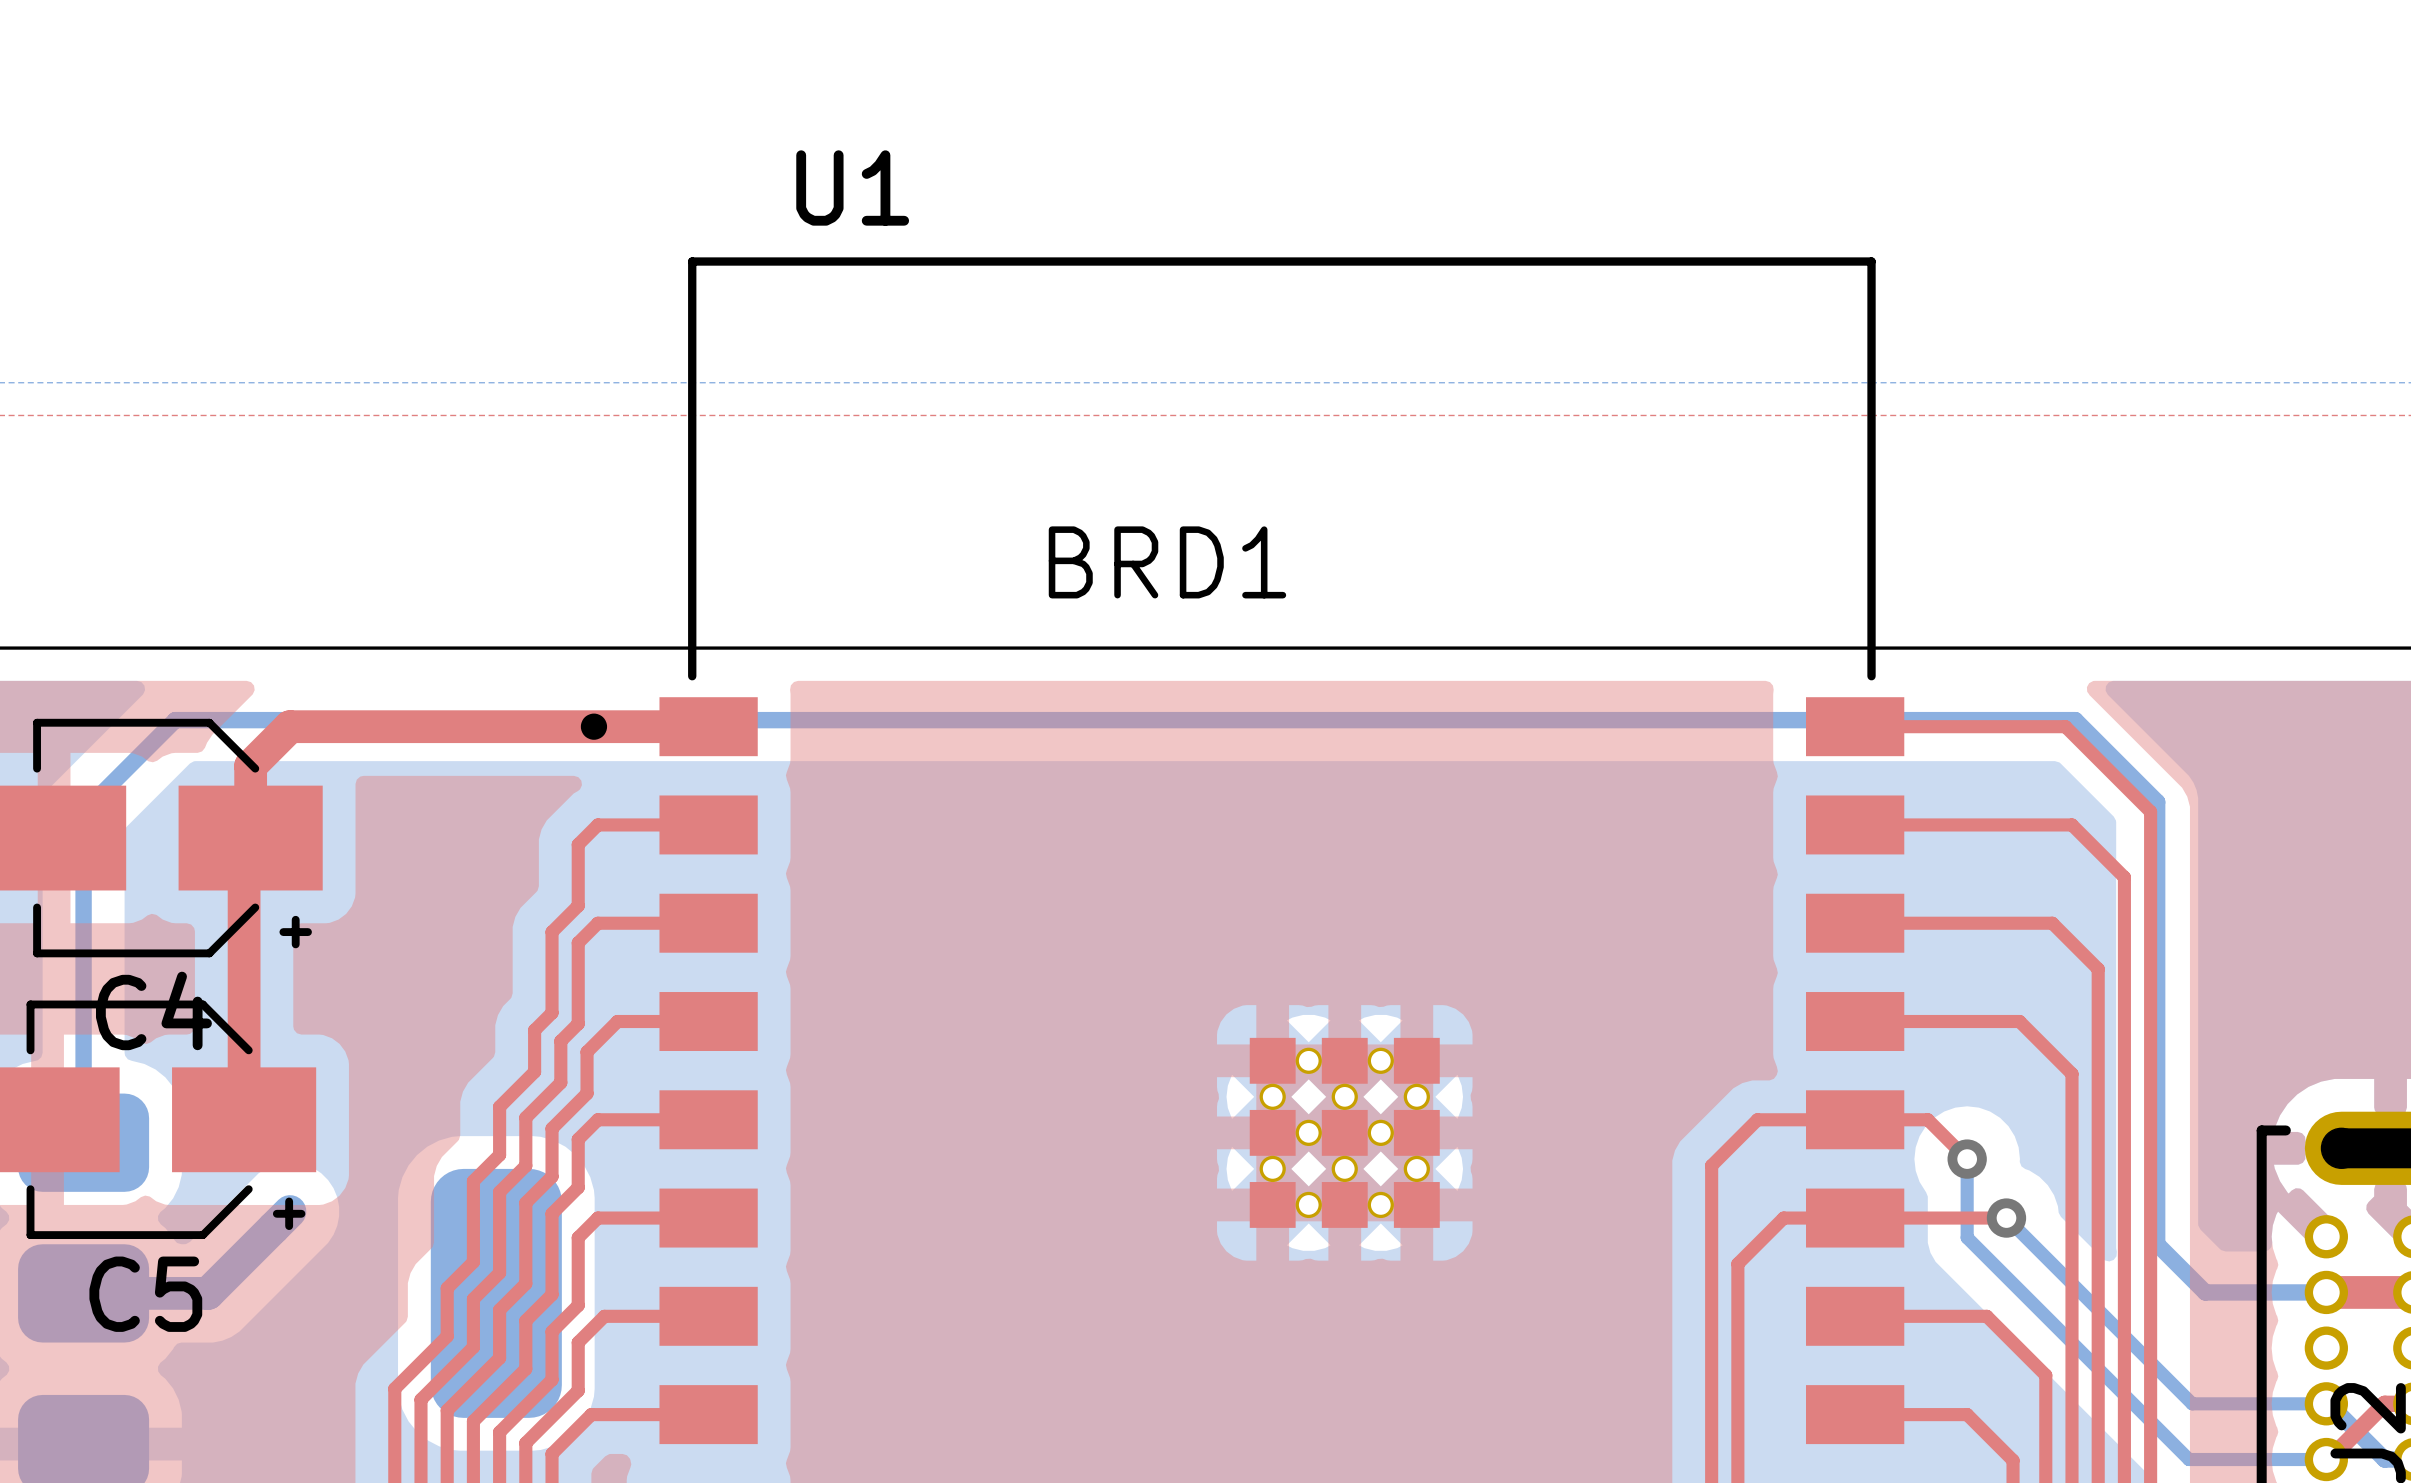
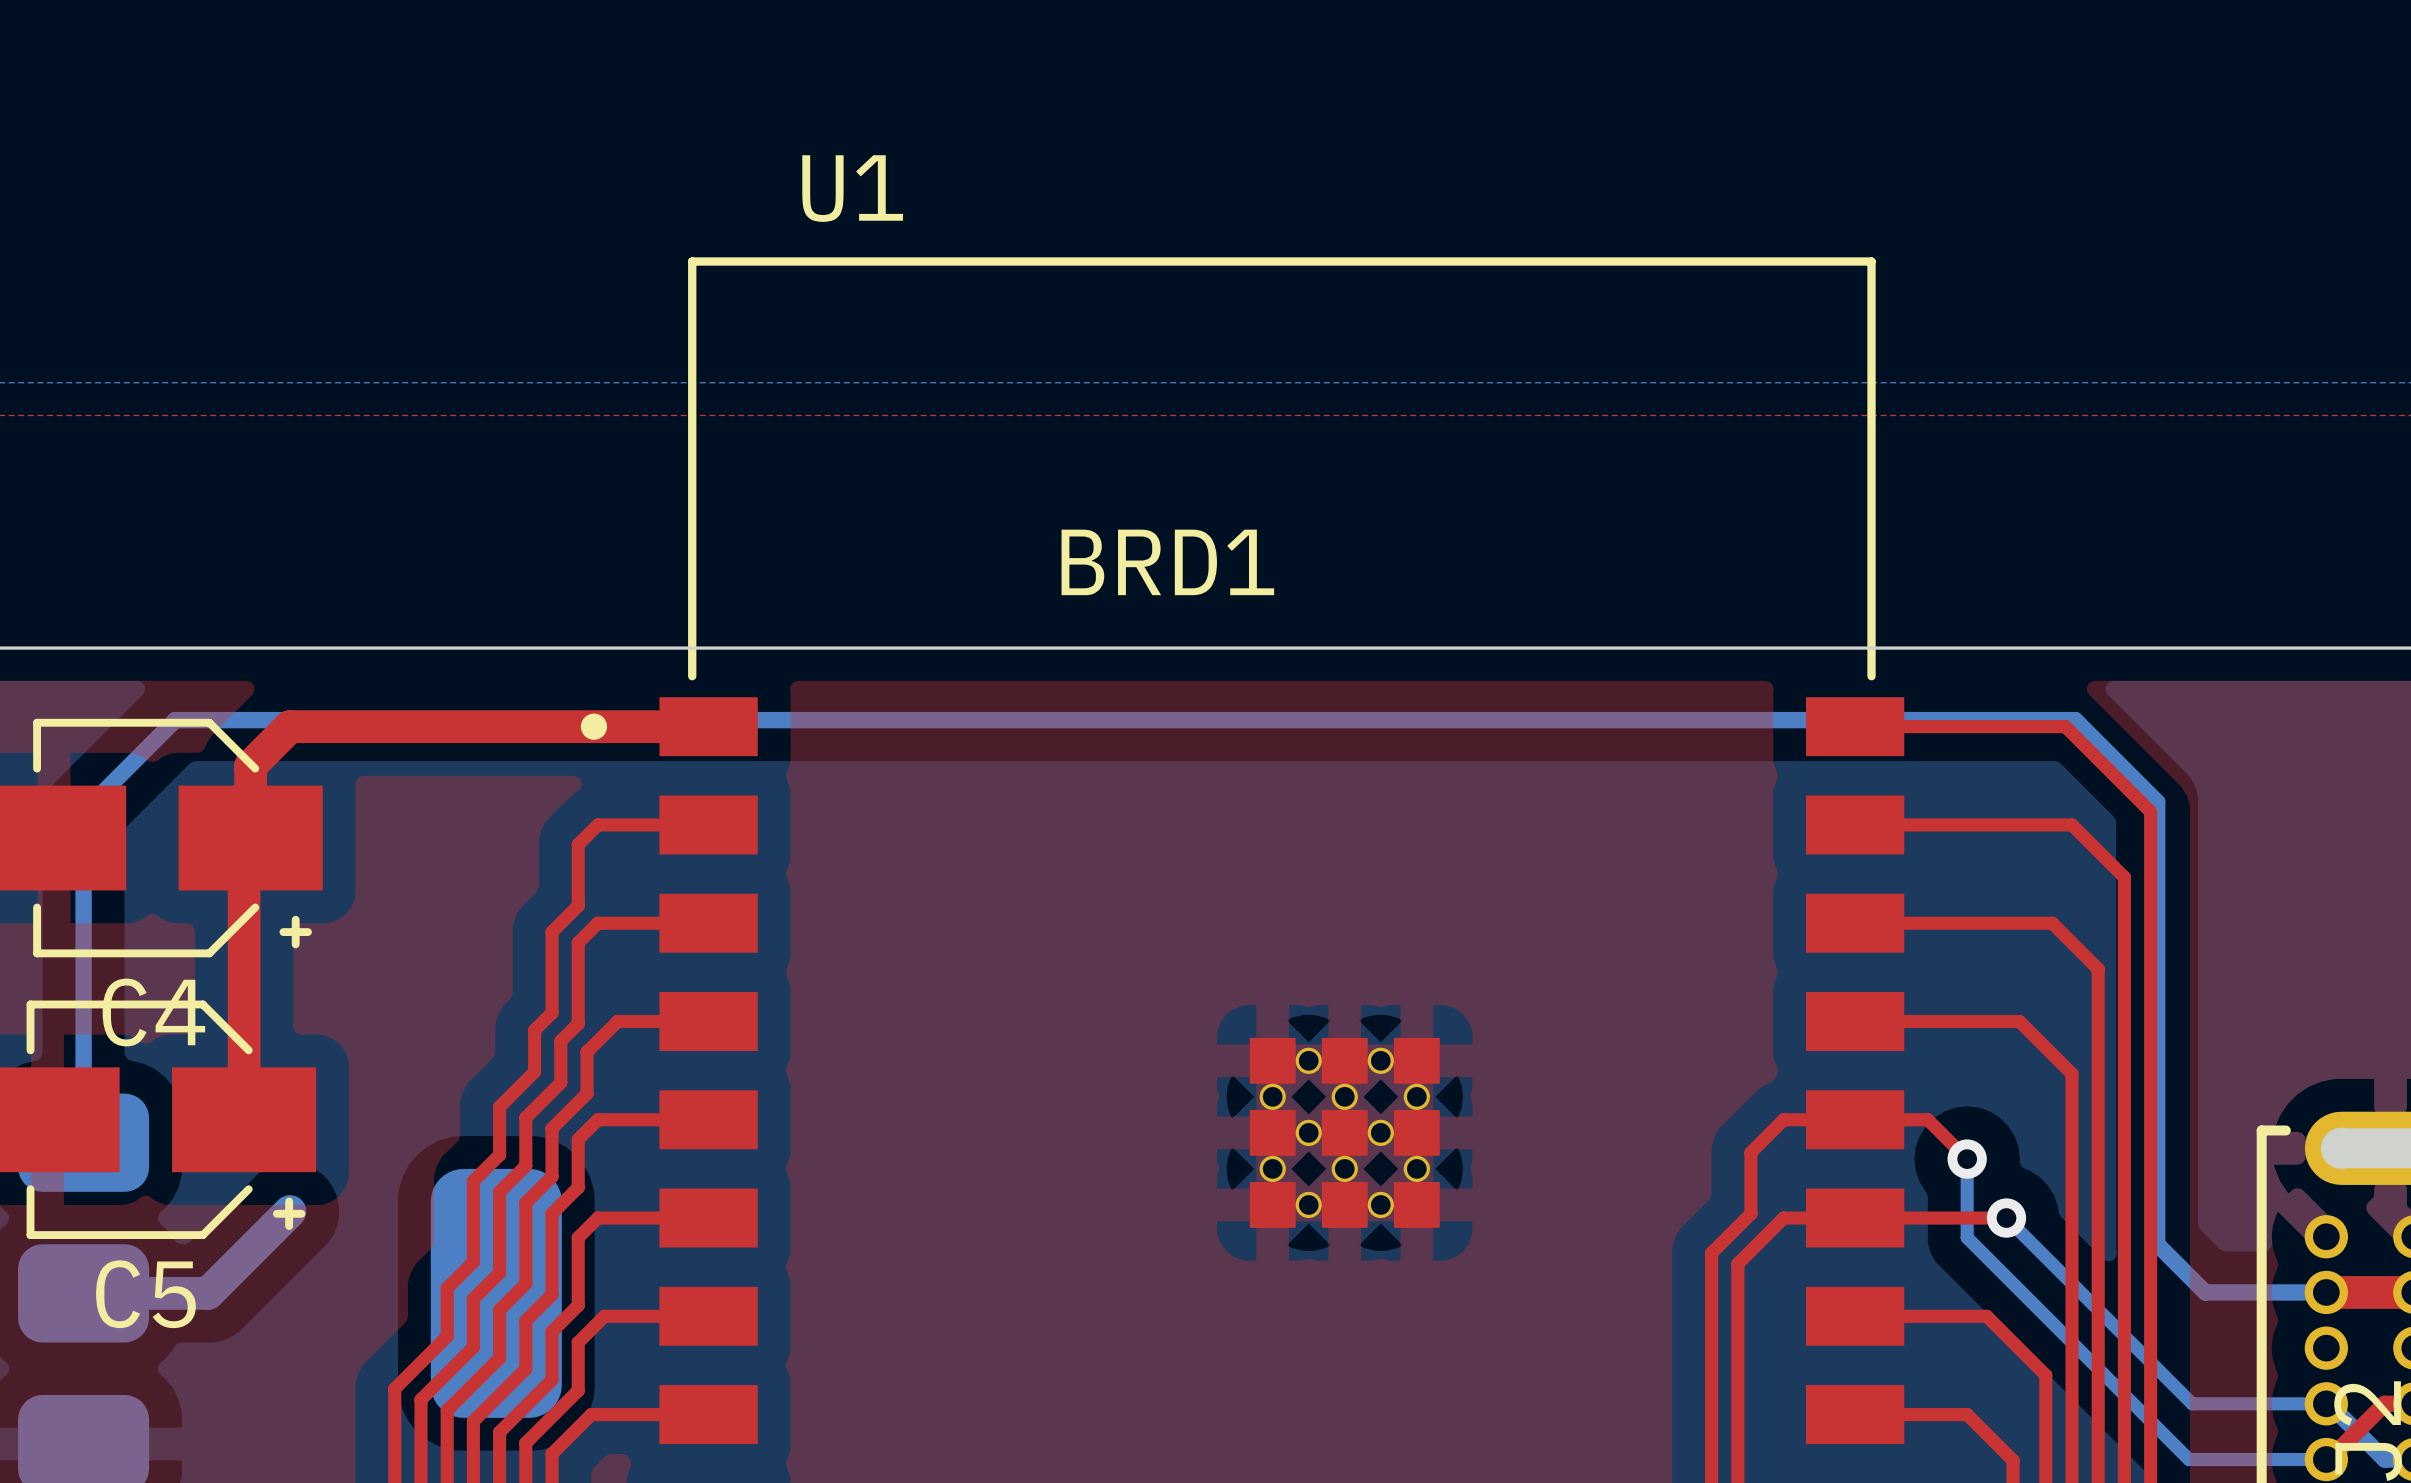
top track: (1783, 1119) (1757, 1119) (1711, 1165) (1711, 1253) -> (1783, 1119) (1750, 1152) (1750, 1213) (1711, 1253)

